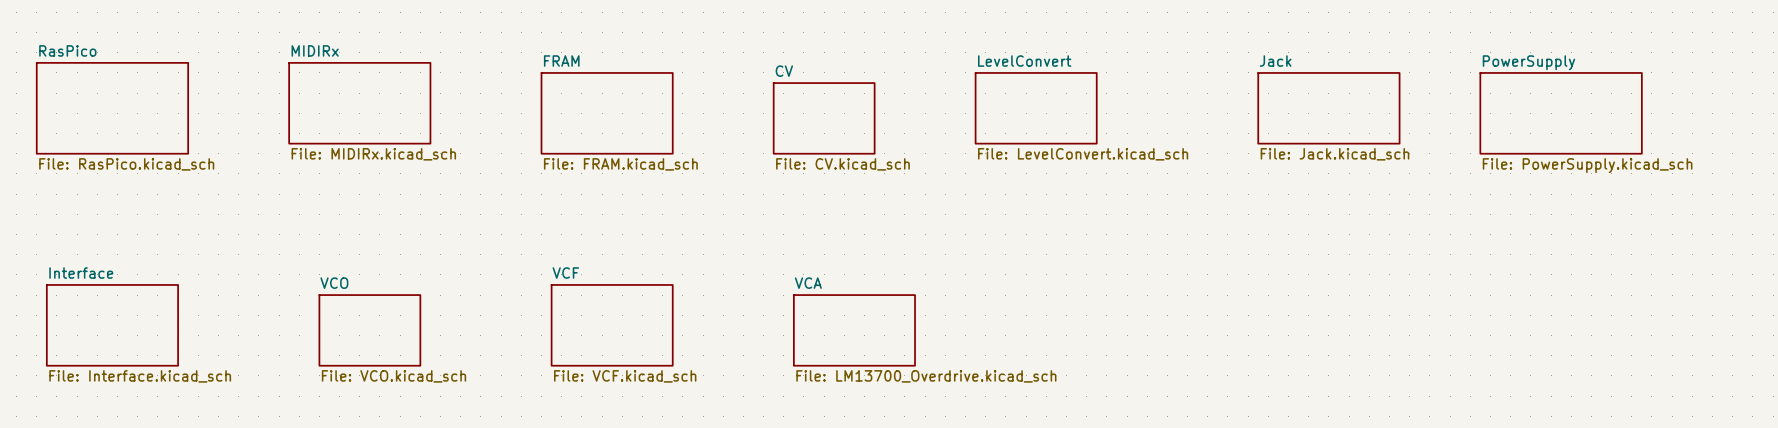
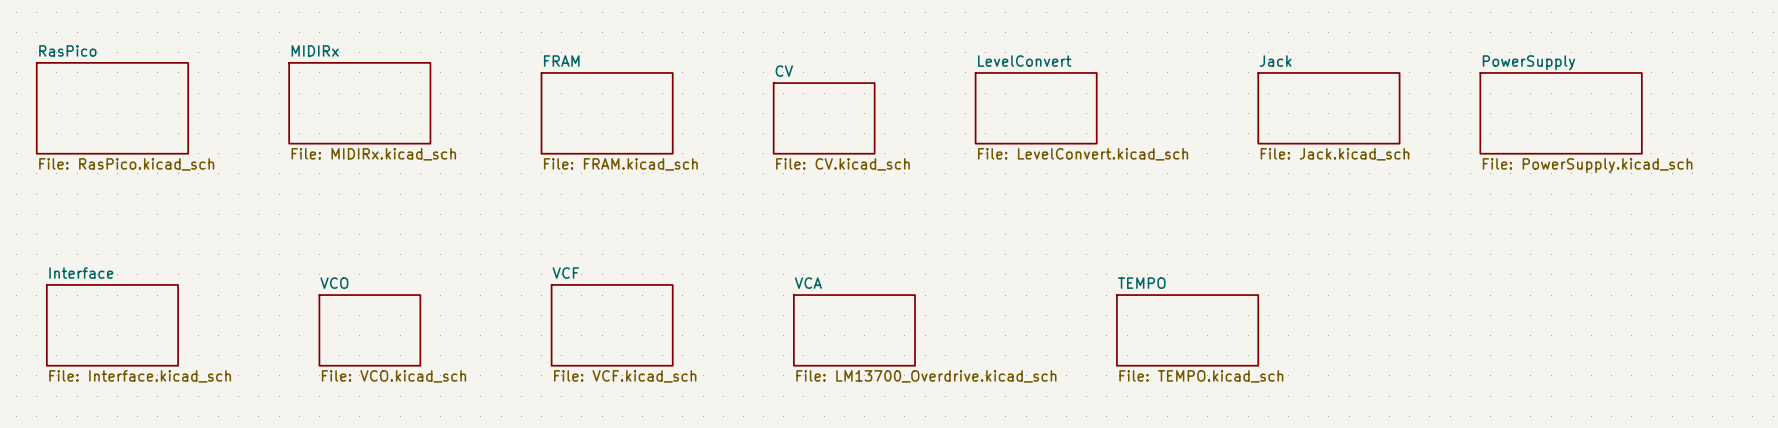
sheet TEMPO: none -> File: TEMPO.kicad_sch (1187, 330)

